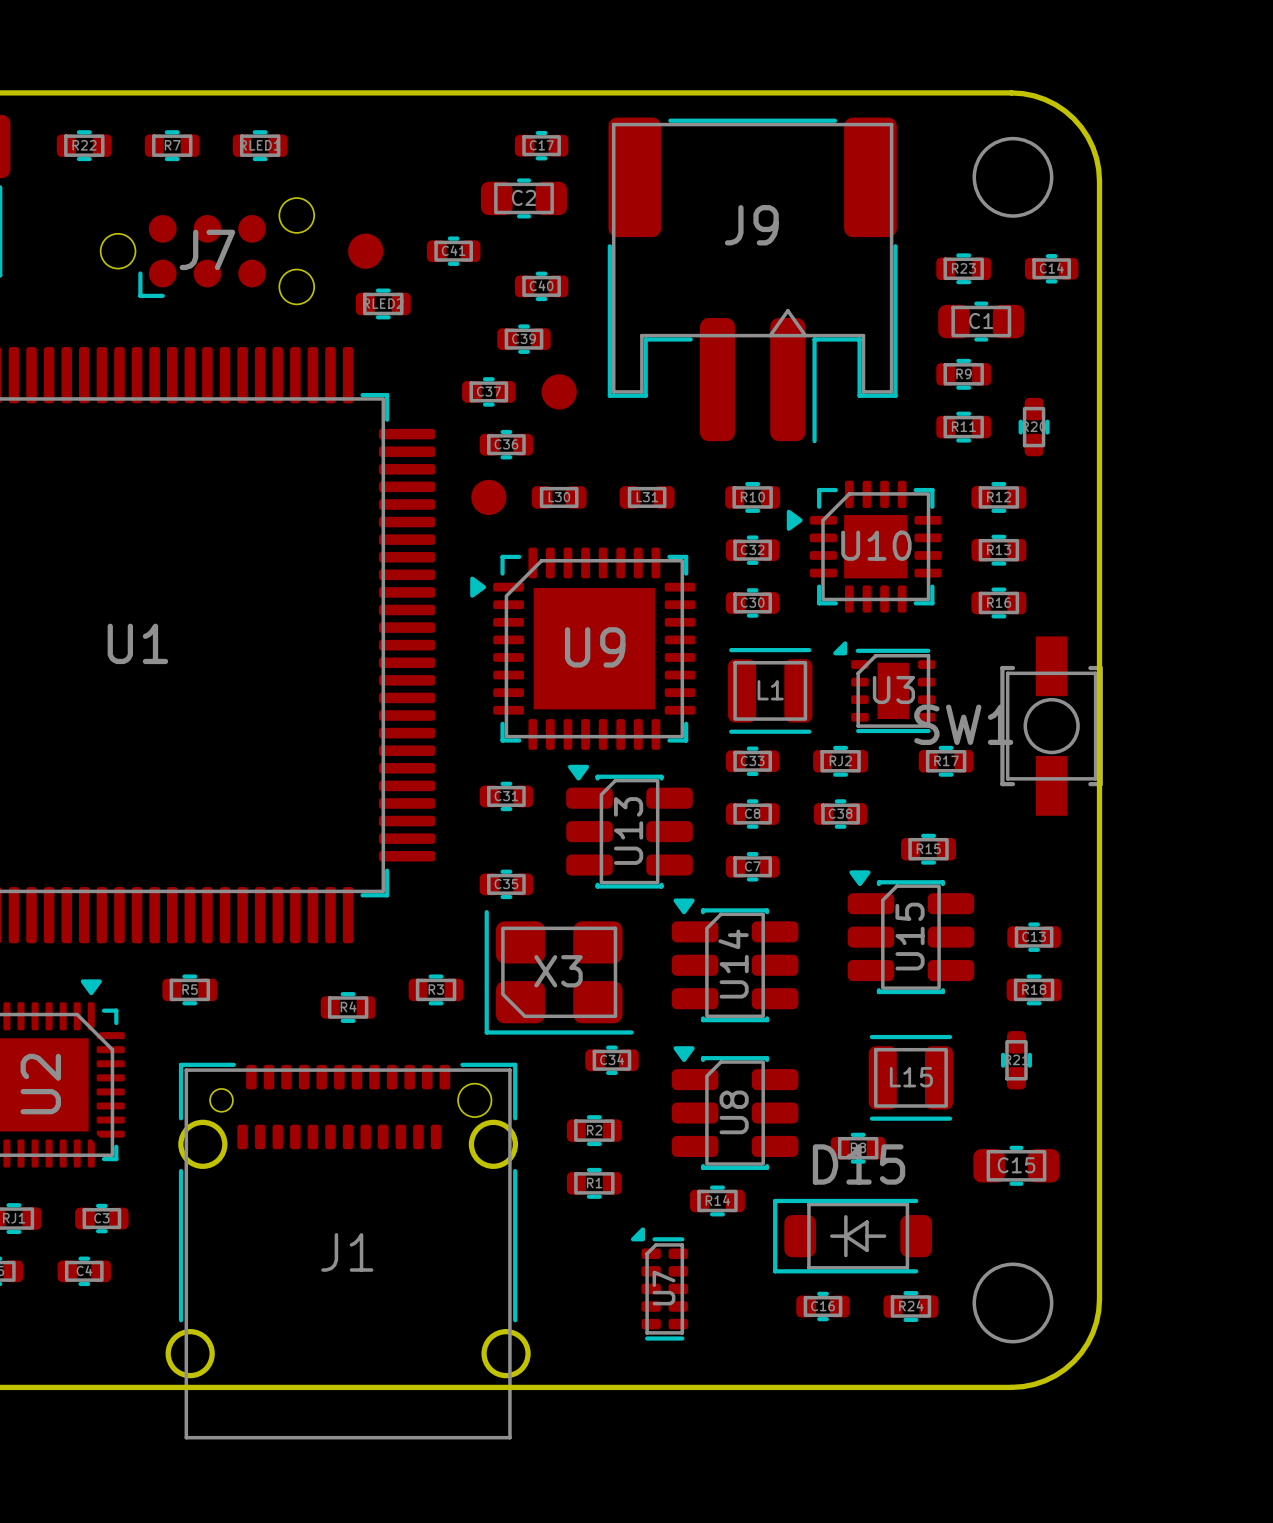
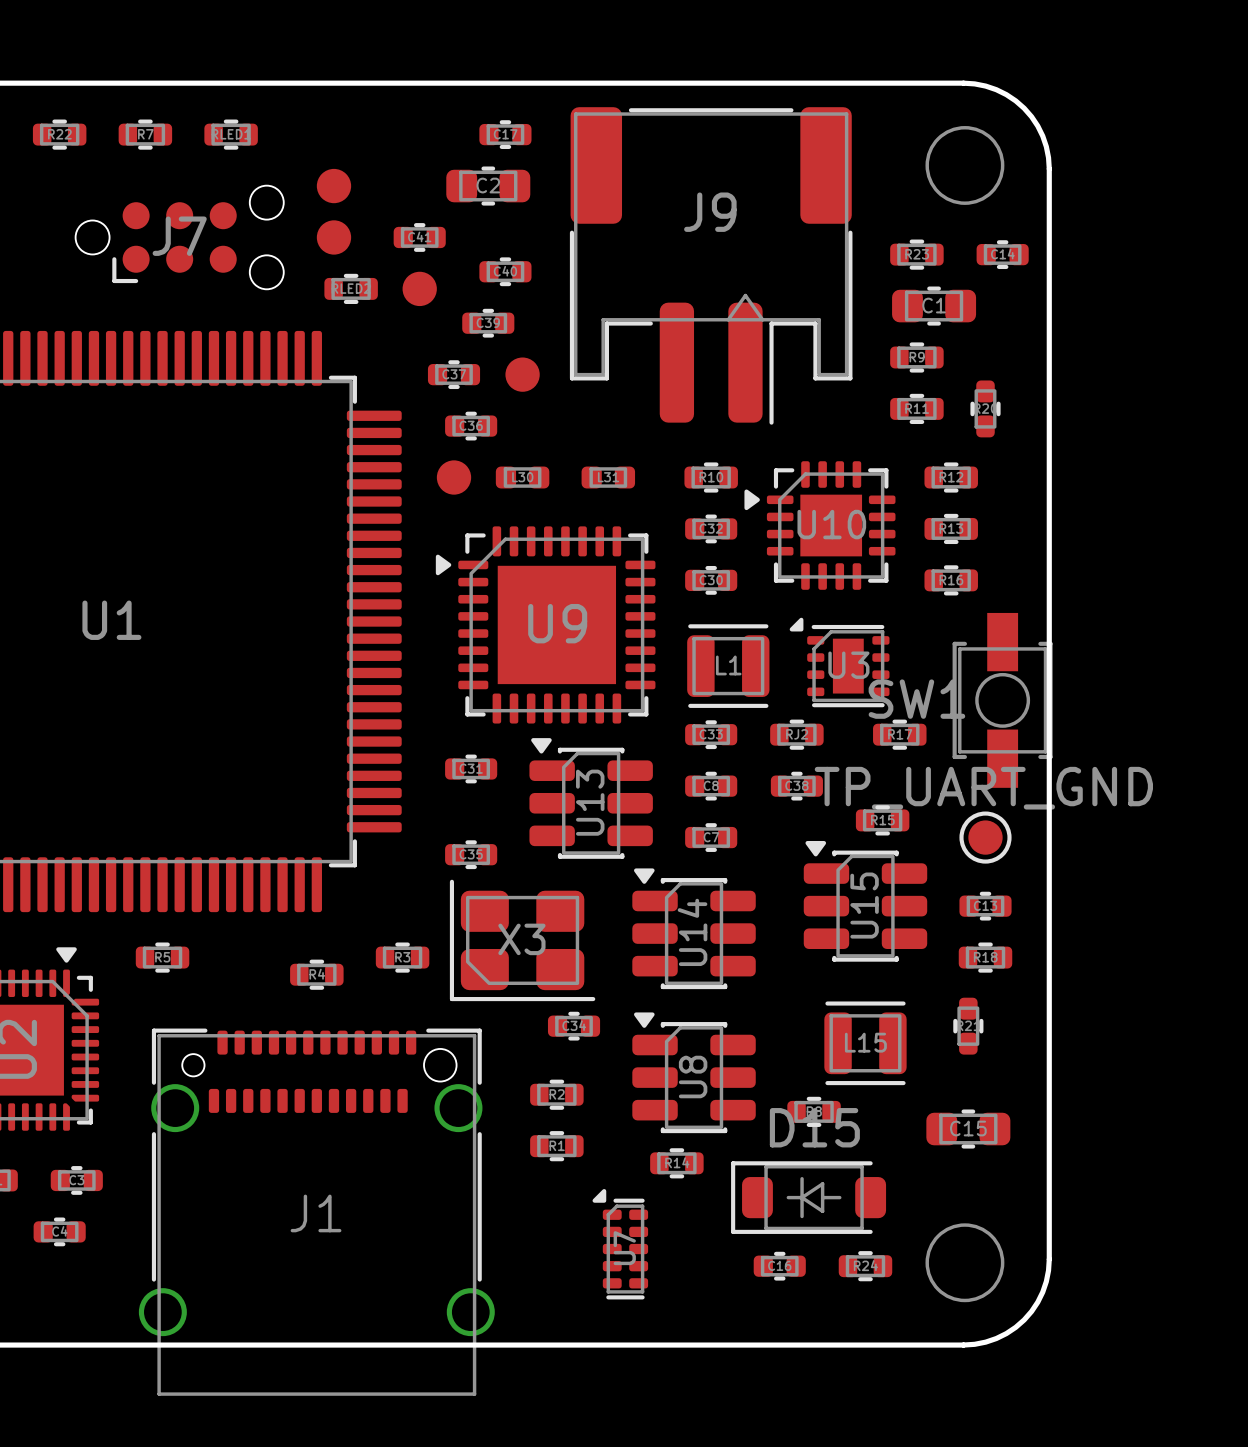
part: none -> (333, 186)
part: none -> (419, 288)
TP_UART_GND: none -> (985, 837)

